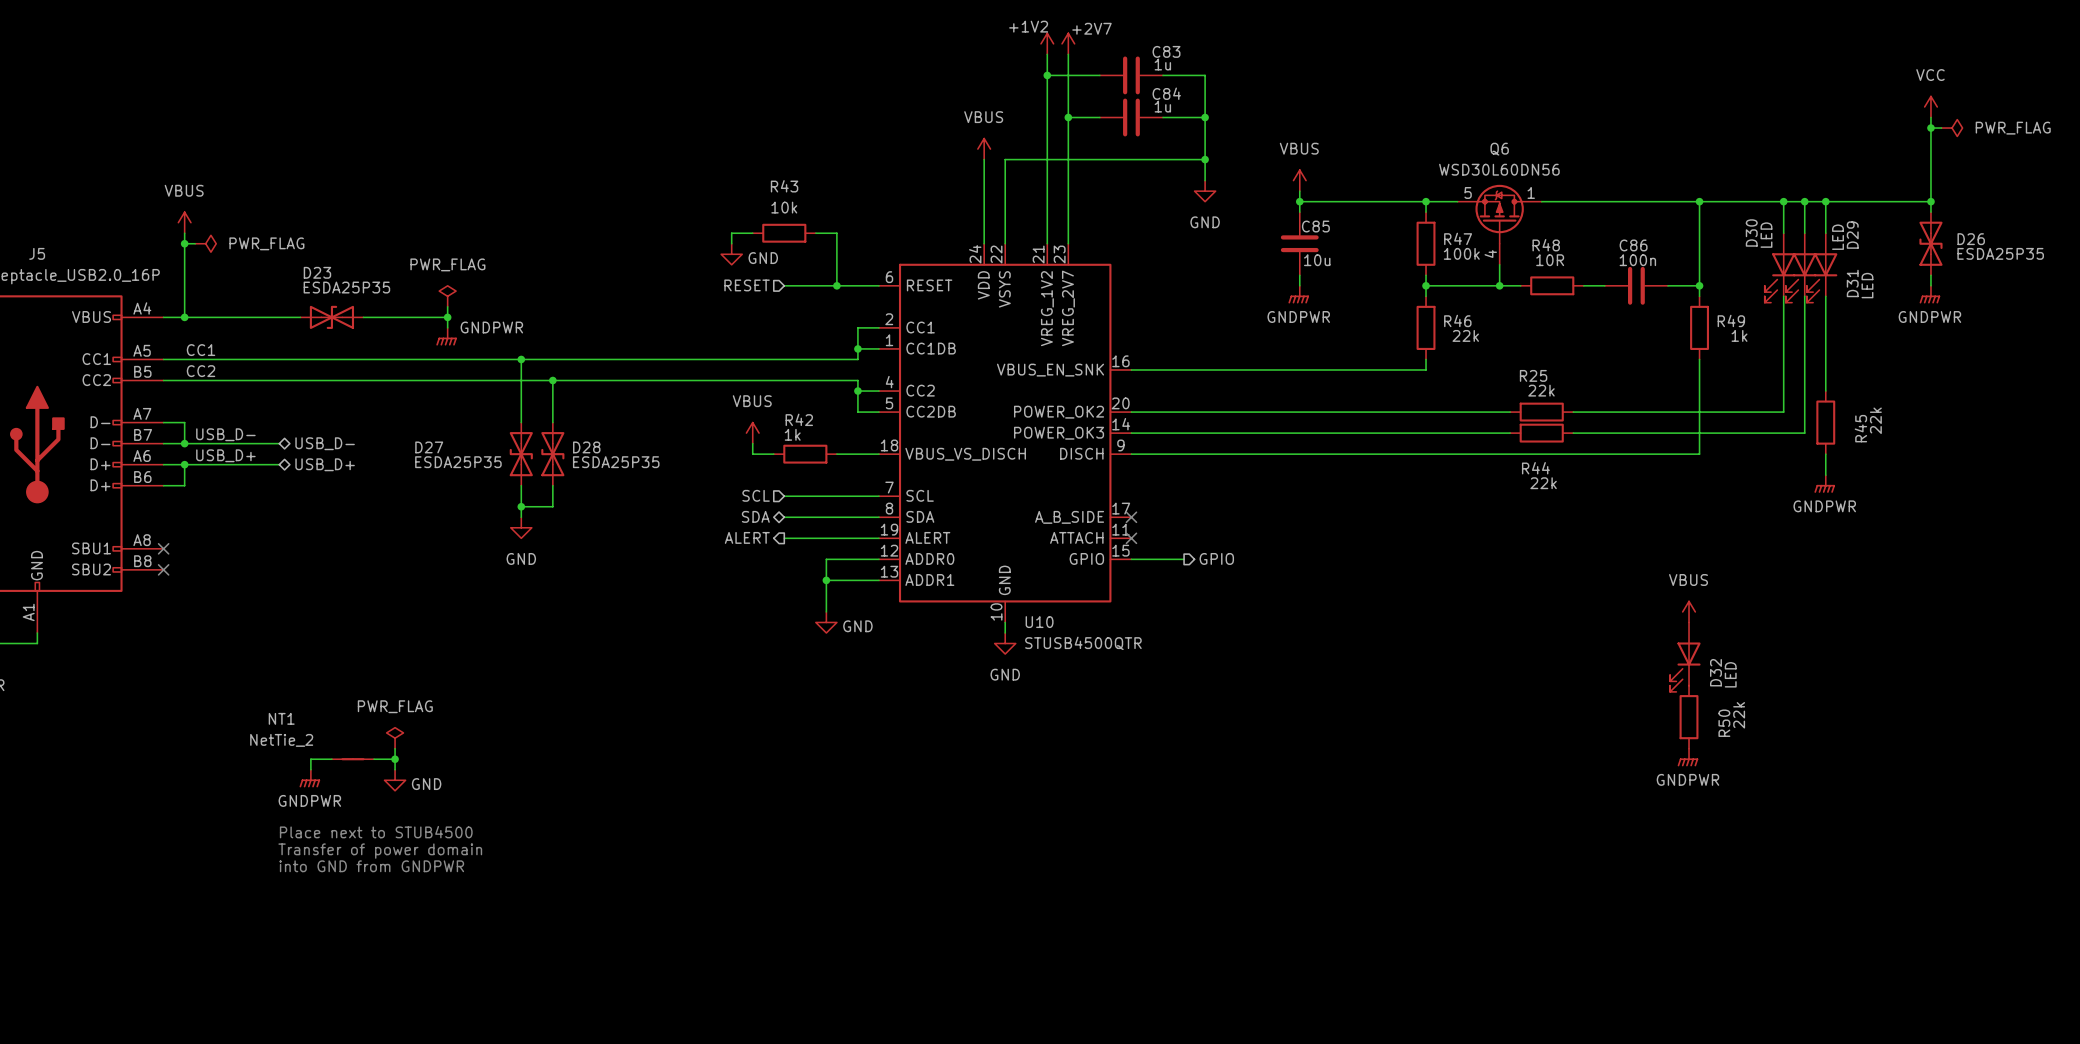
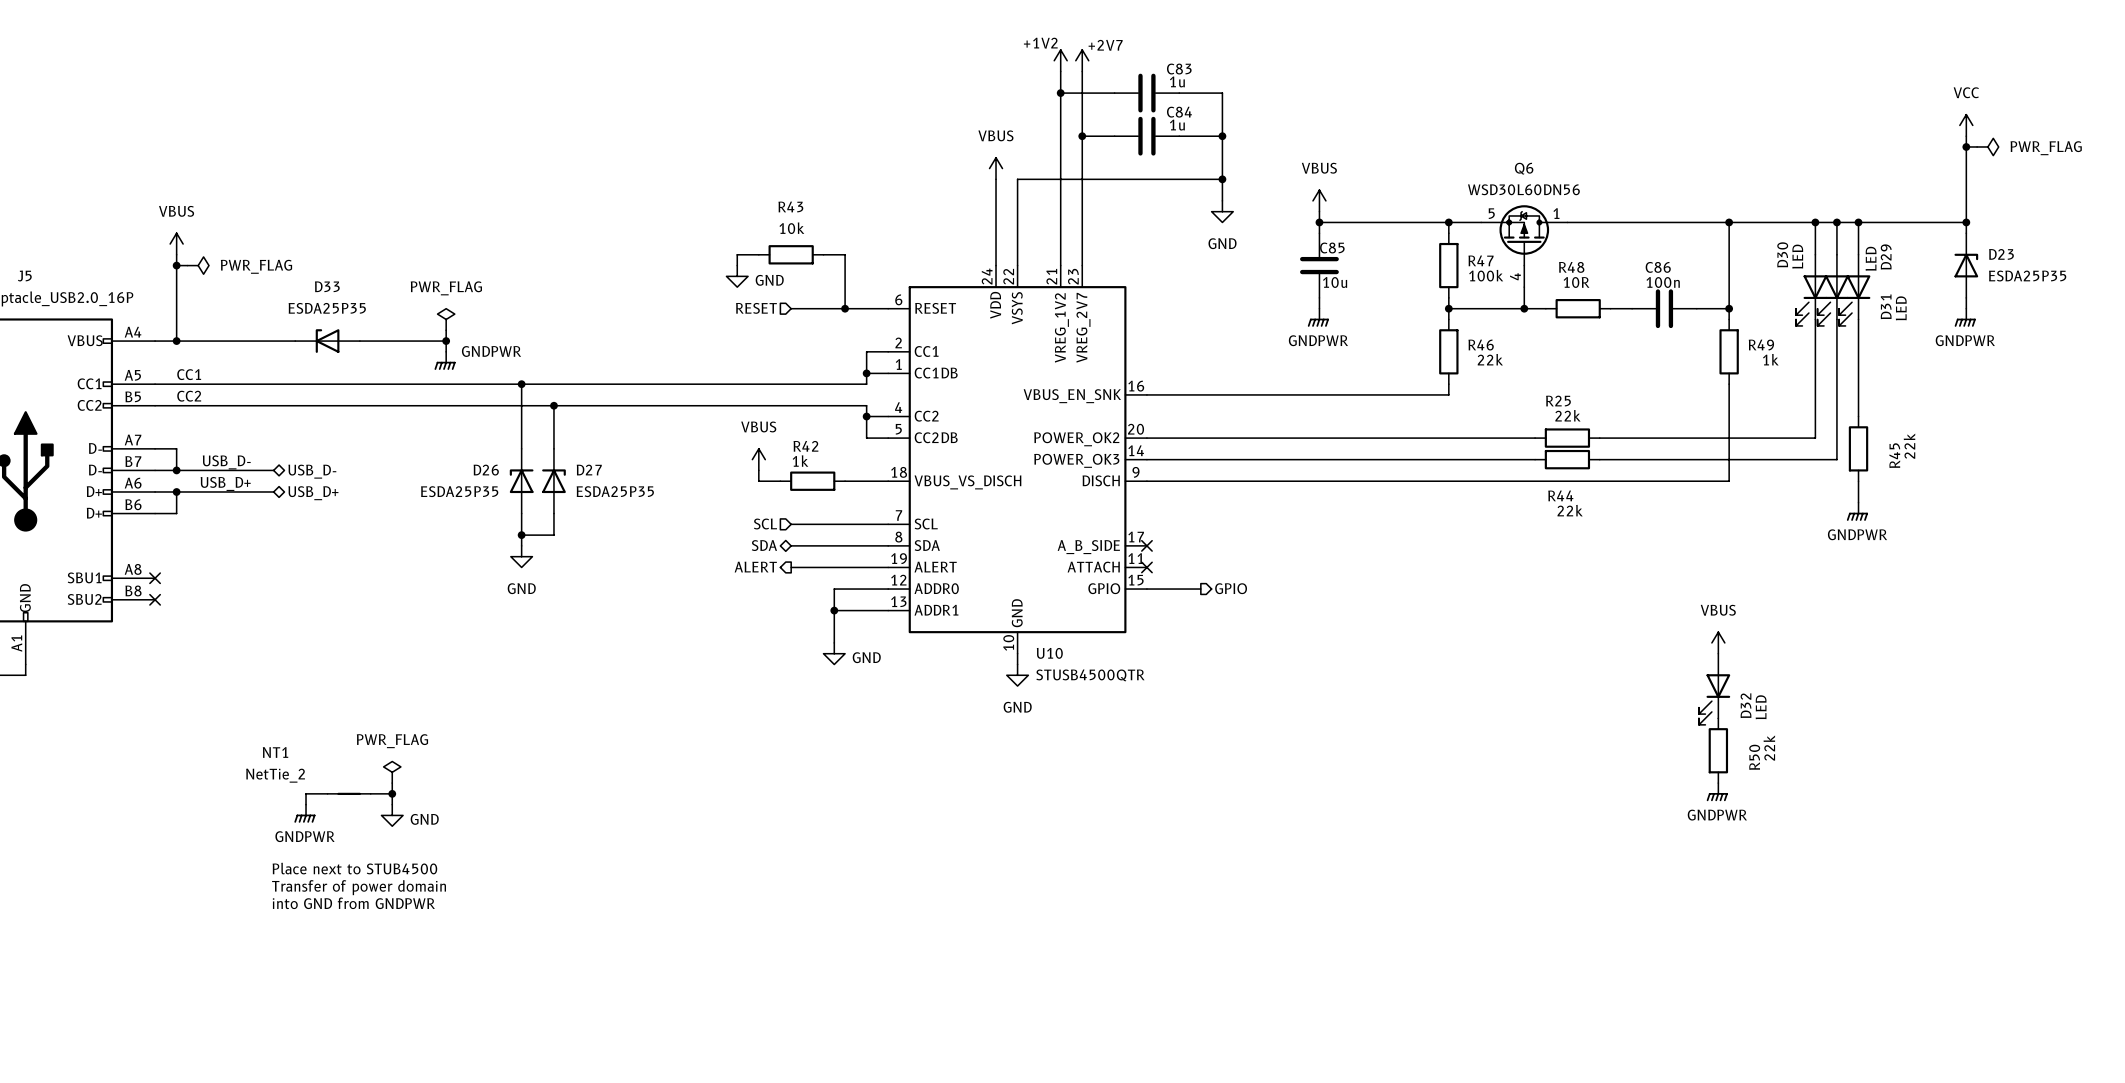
D26 symbol: [1919, 212, 1943, 276] -> [509, 448, 534, 514]
D26 name position: D26 (1971, 239) -> D26 (486, 470)
D26 value position: ESDA25P35 (2000, 253) -> ESDA25P35 (459, 491)
D23 name position: D23 (317, 272) -> D23 (2001, 254)
D23 value position: ESDA25P35 (346, 287) -> ESDA25P35 (2027, 276)
D23 symbol: [300, 305, 364, 329] -> [1954, 233, 1979, 298]
D33: none -> ESDA25P35 (327, 341)
D27 symbol: [509, 422, 533, 486] -> [542, 448, 566, 514]
D27 name position: D27 (429, 447) -> D27 (589, 470)
D28: ESDA25P35 (552, 454) -> none
D27 value position: ESDA25P35 (458, 462) -> ESDA25P35 (615, 491)

